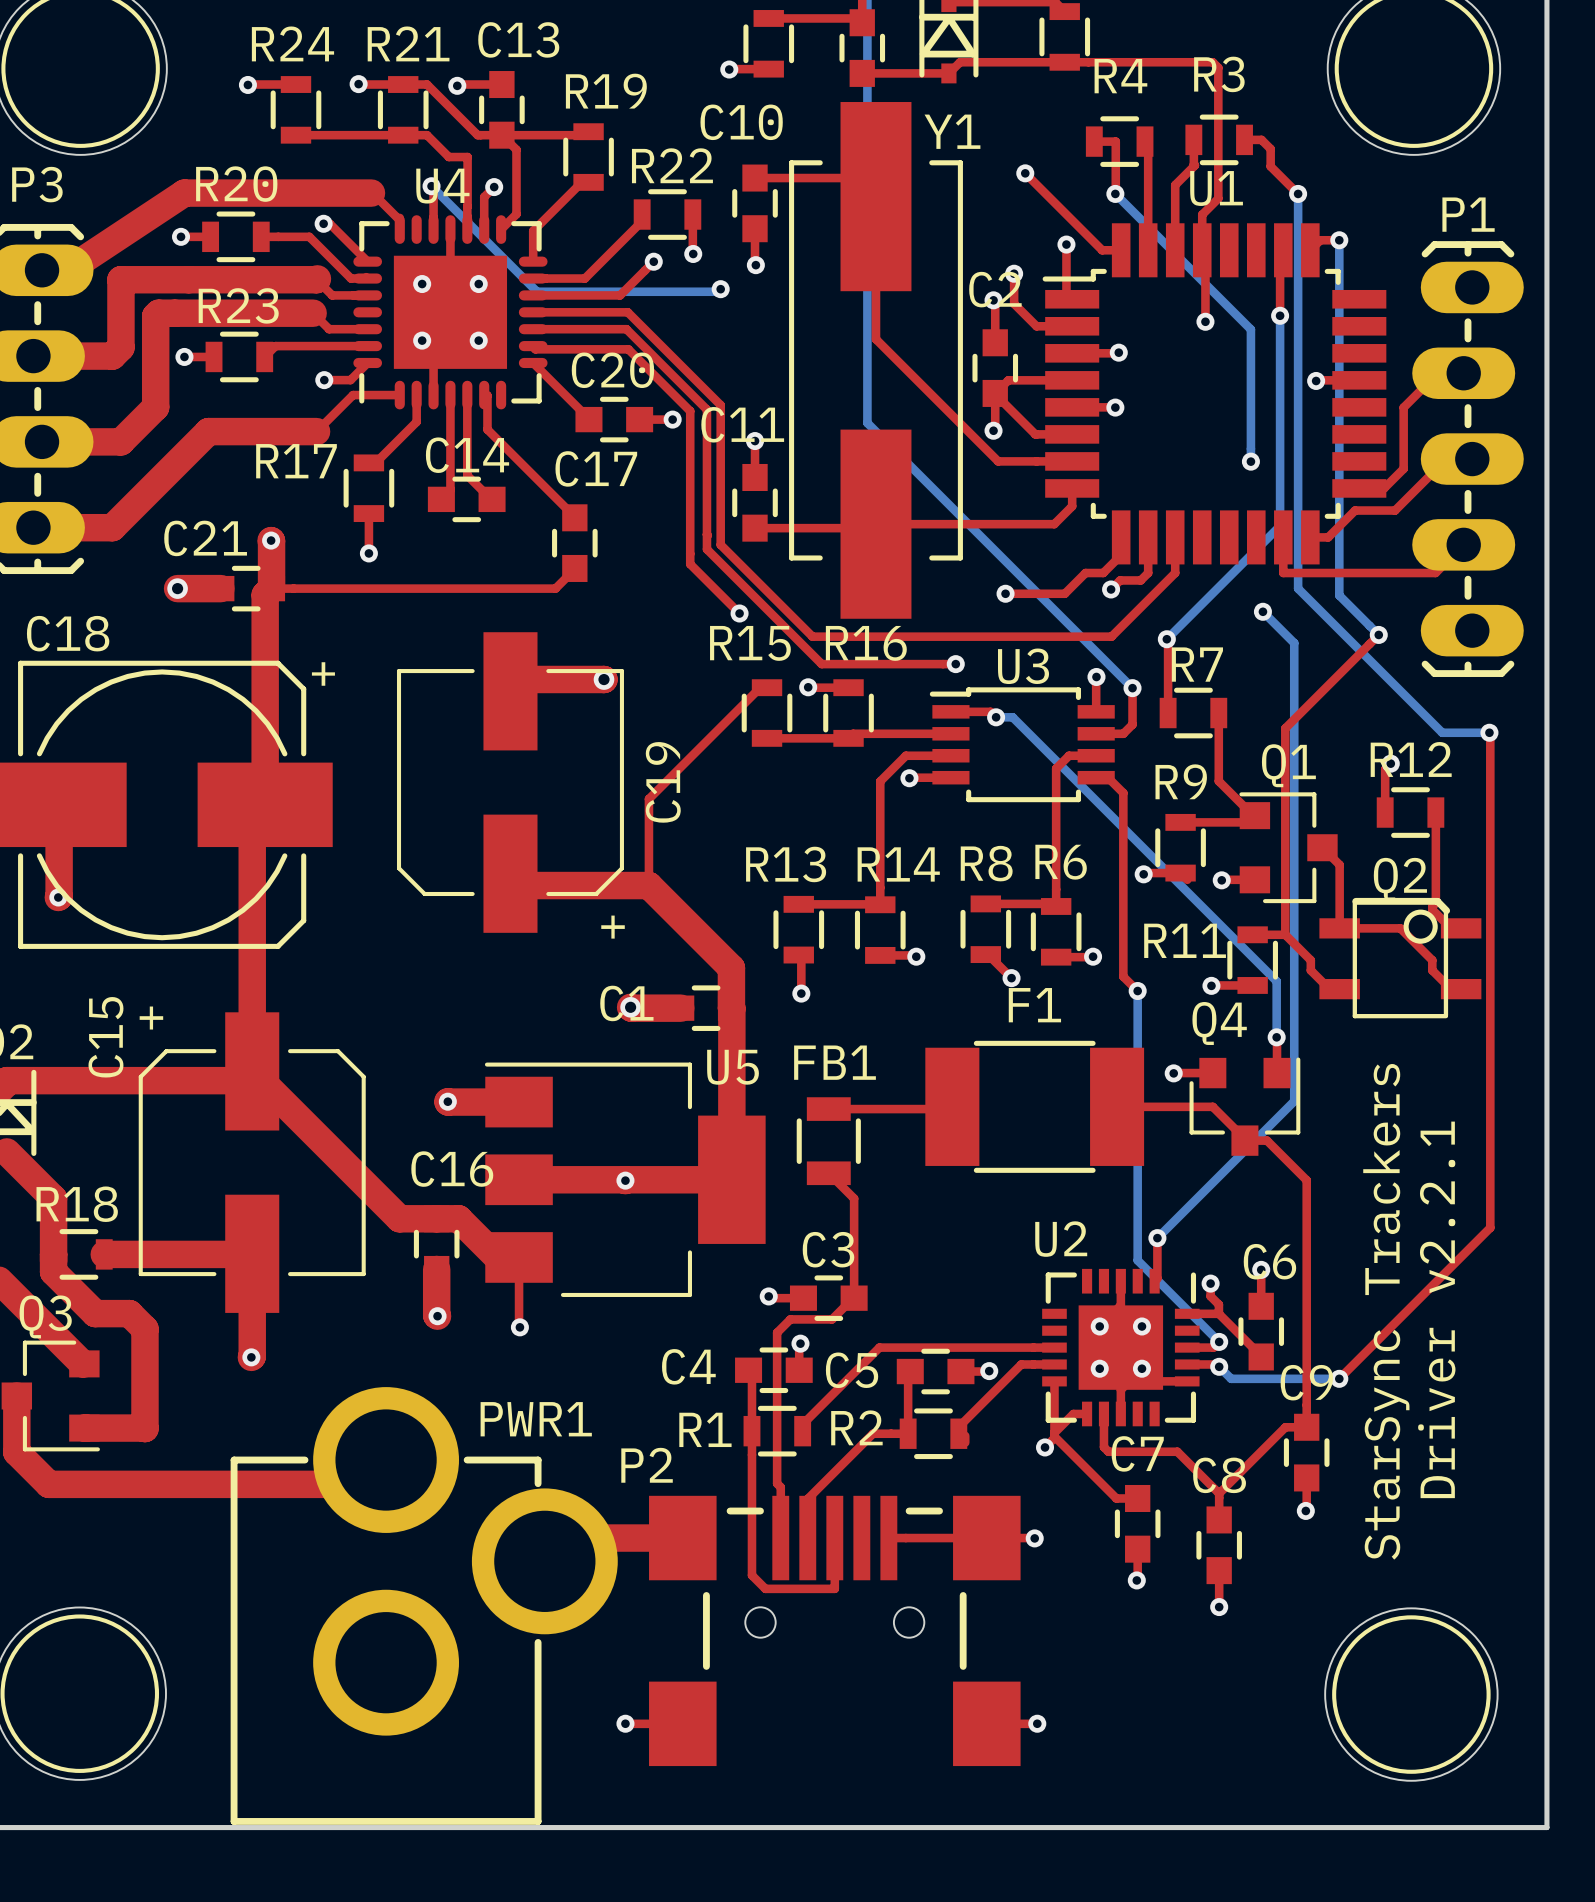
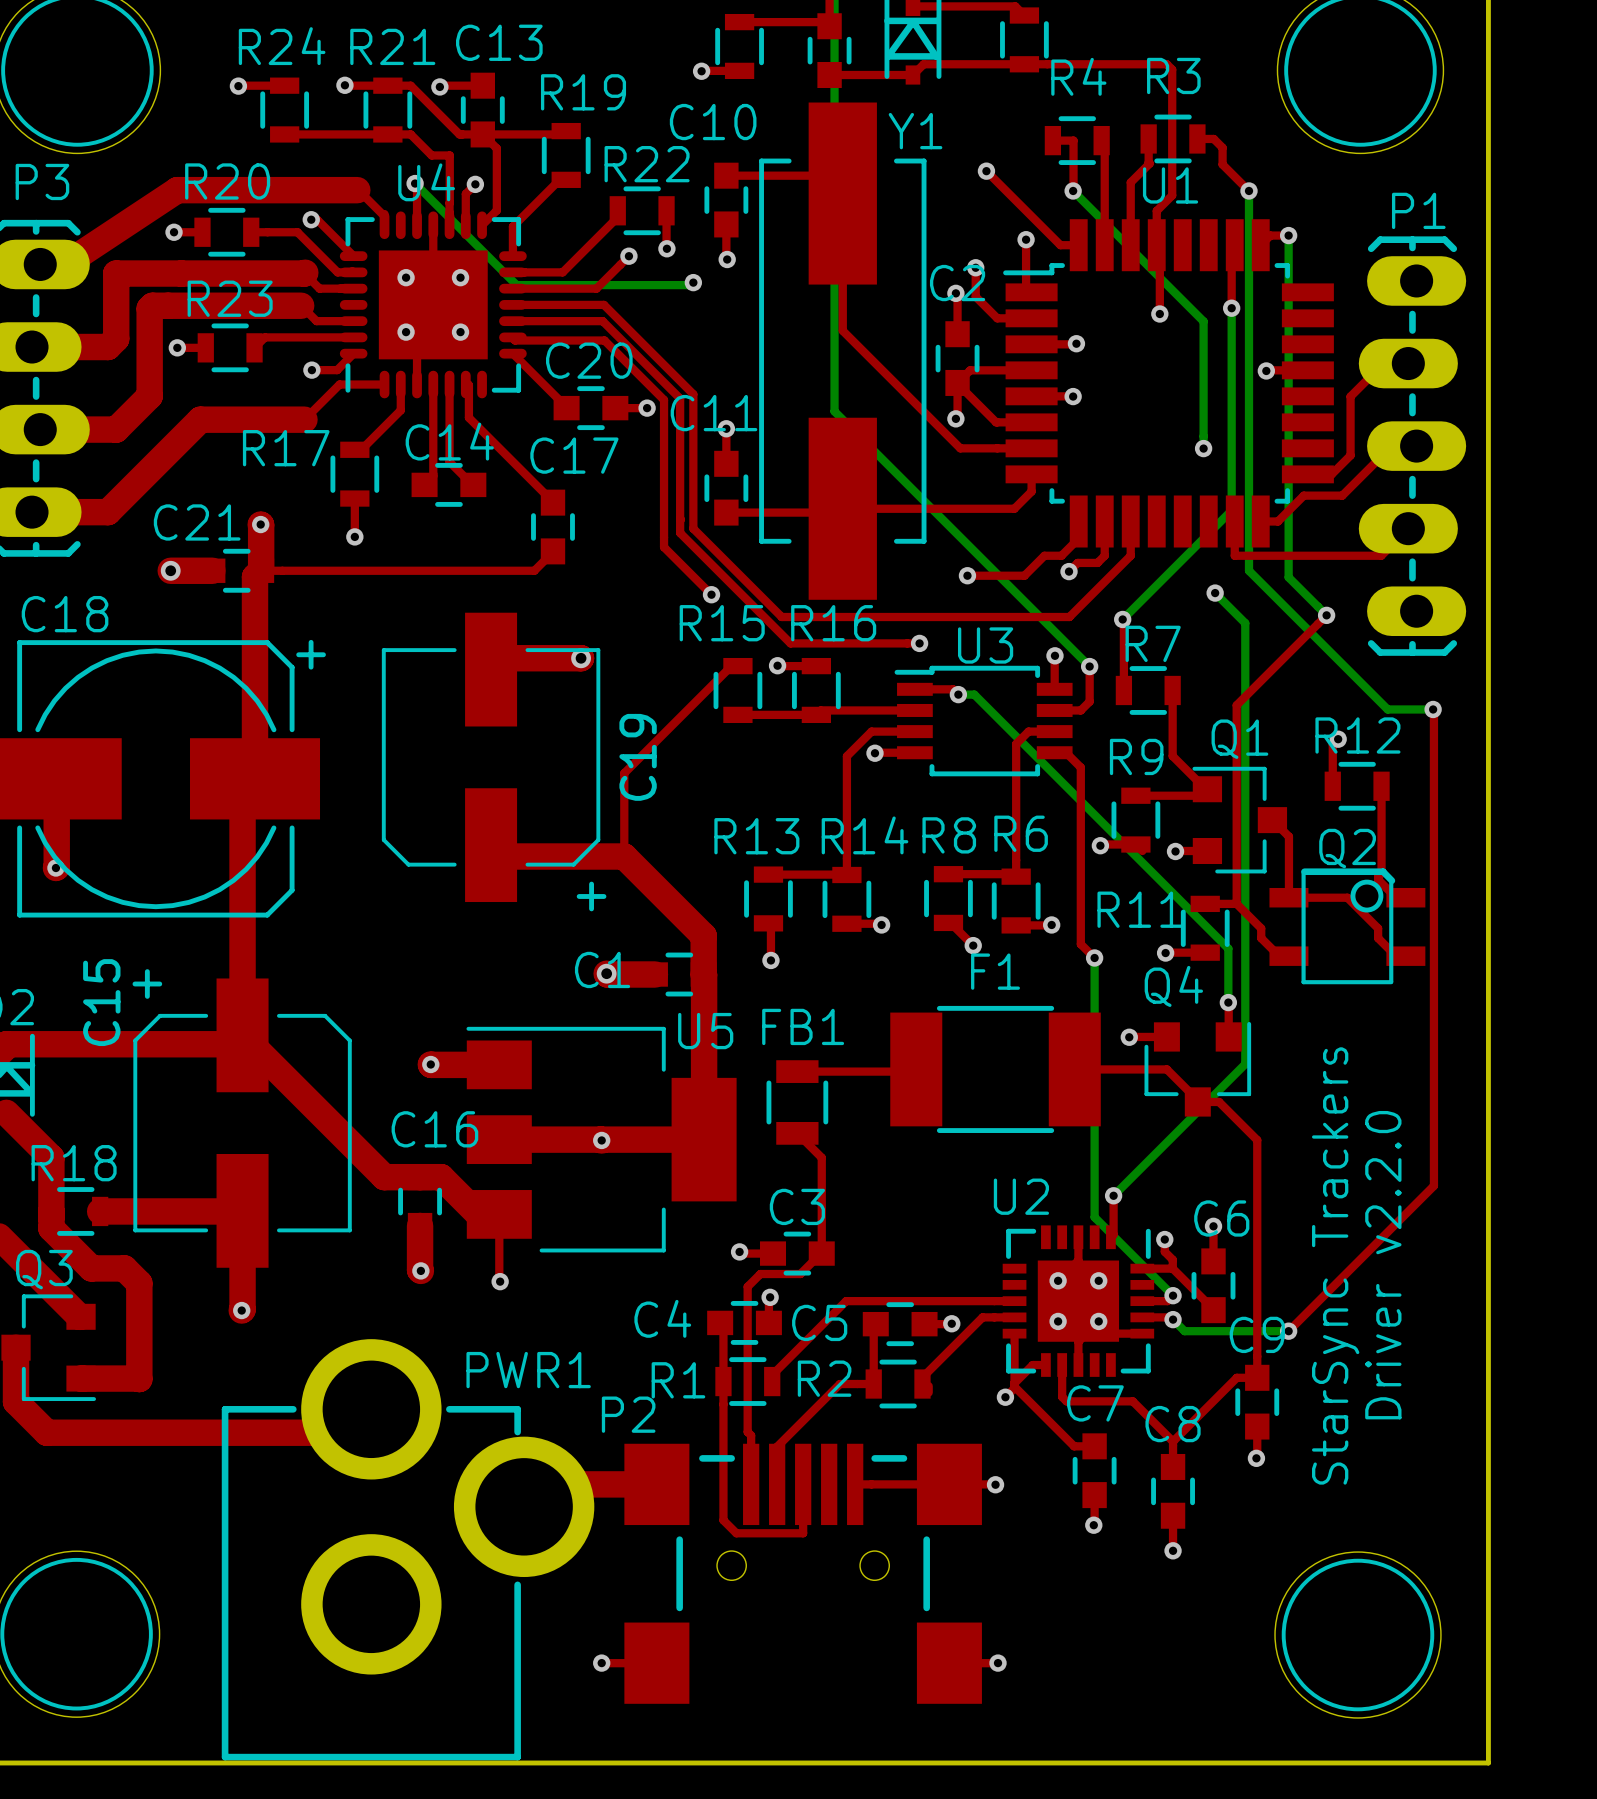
text: Driver v2.2.1 (1436, 1309) -> Driver v2.2.0 (1383, 1265)

